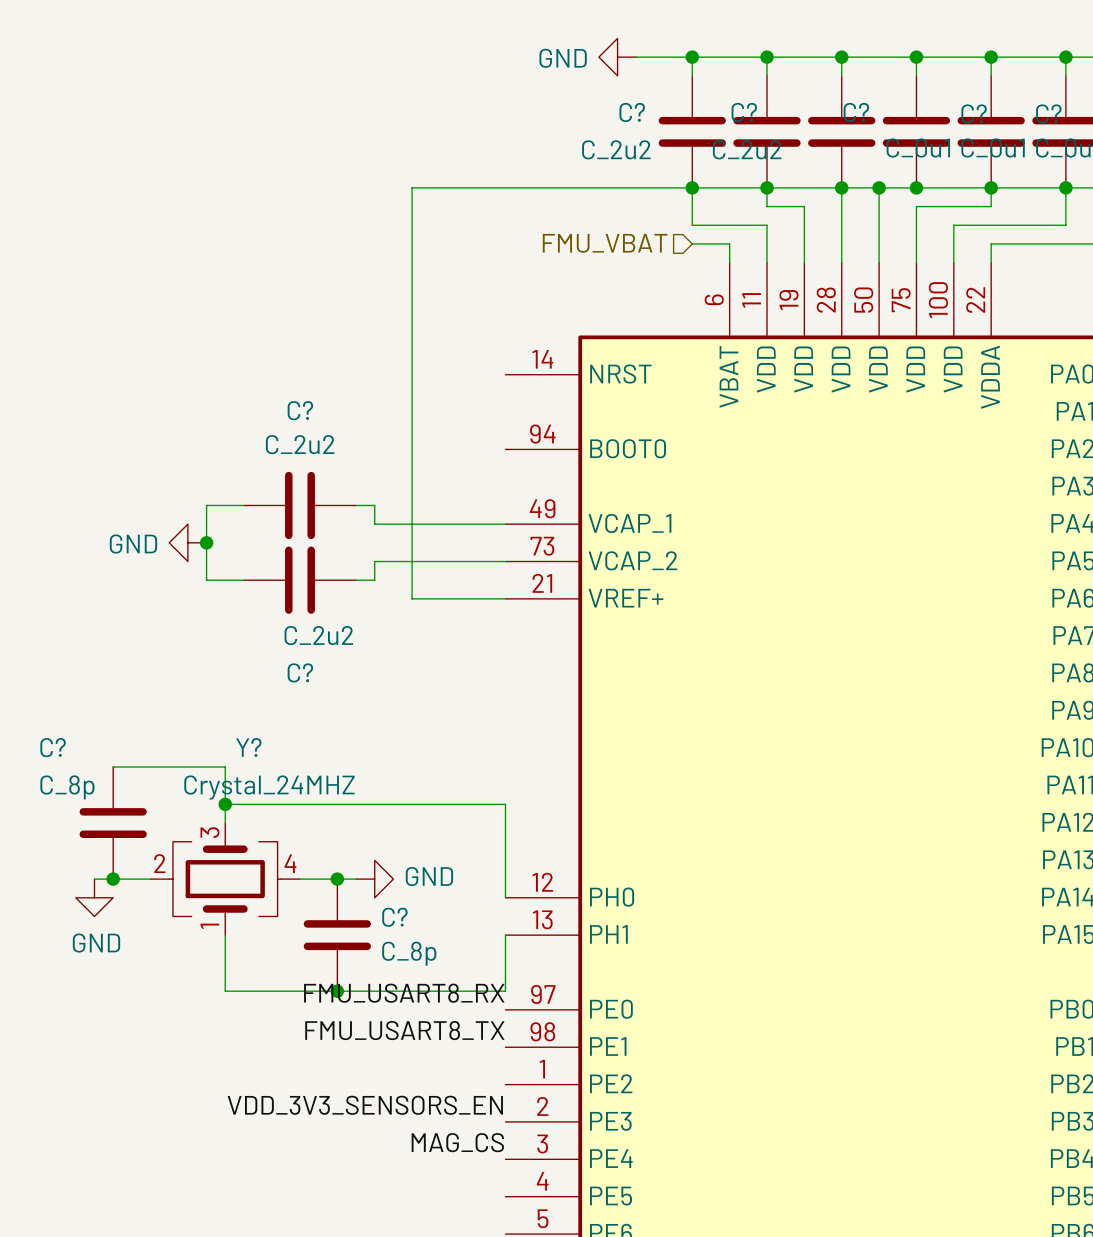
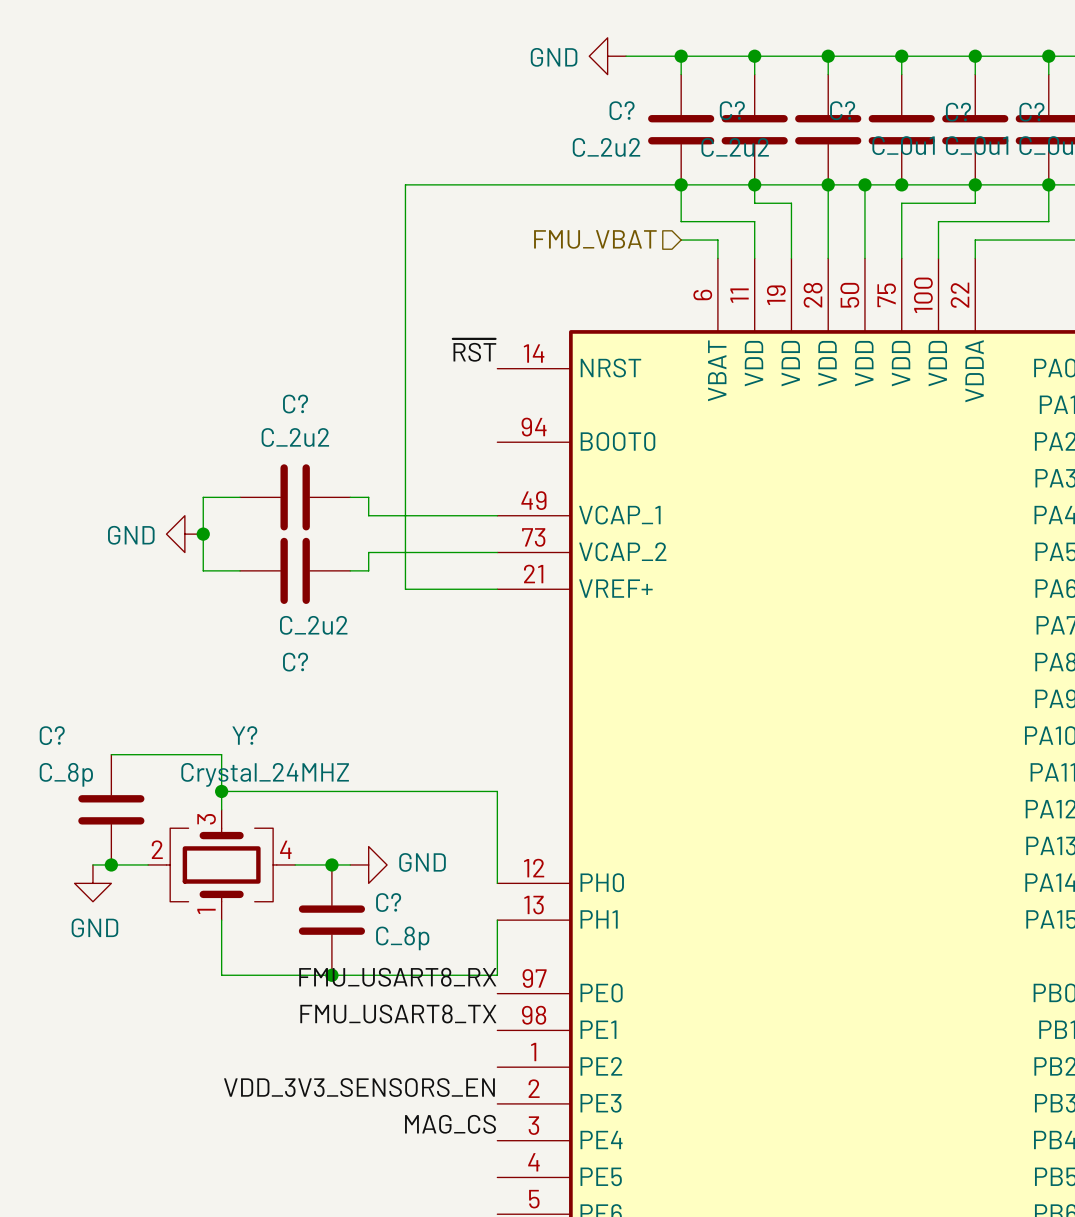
label: none -> ~{RST} (474, 350)

